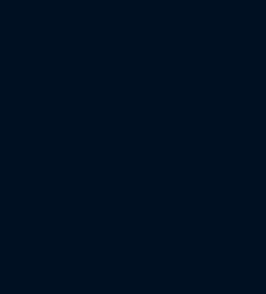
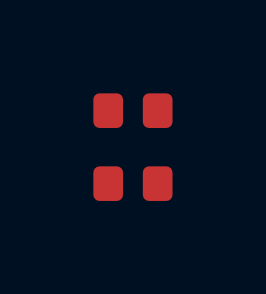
part: none -> (132, 110)
part: none -> (132, 183)

